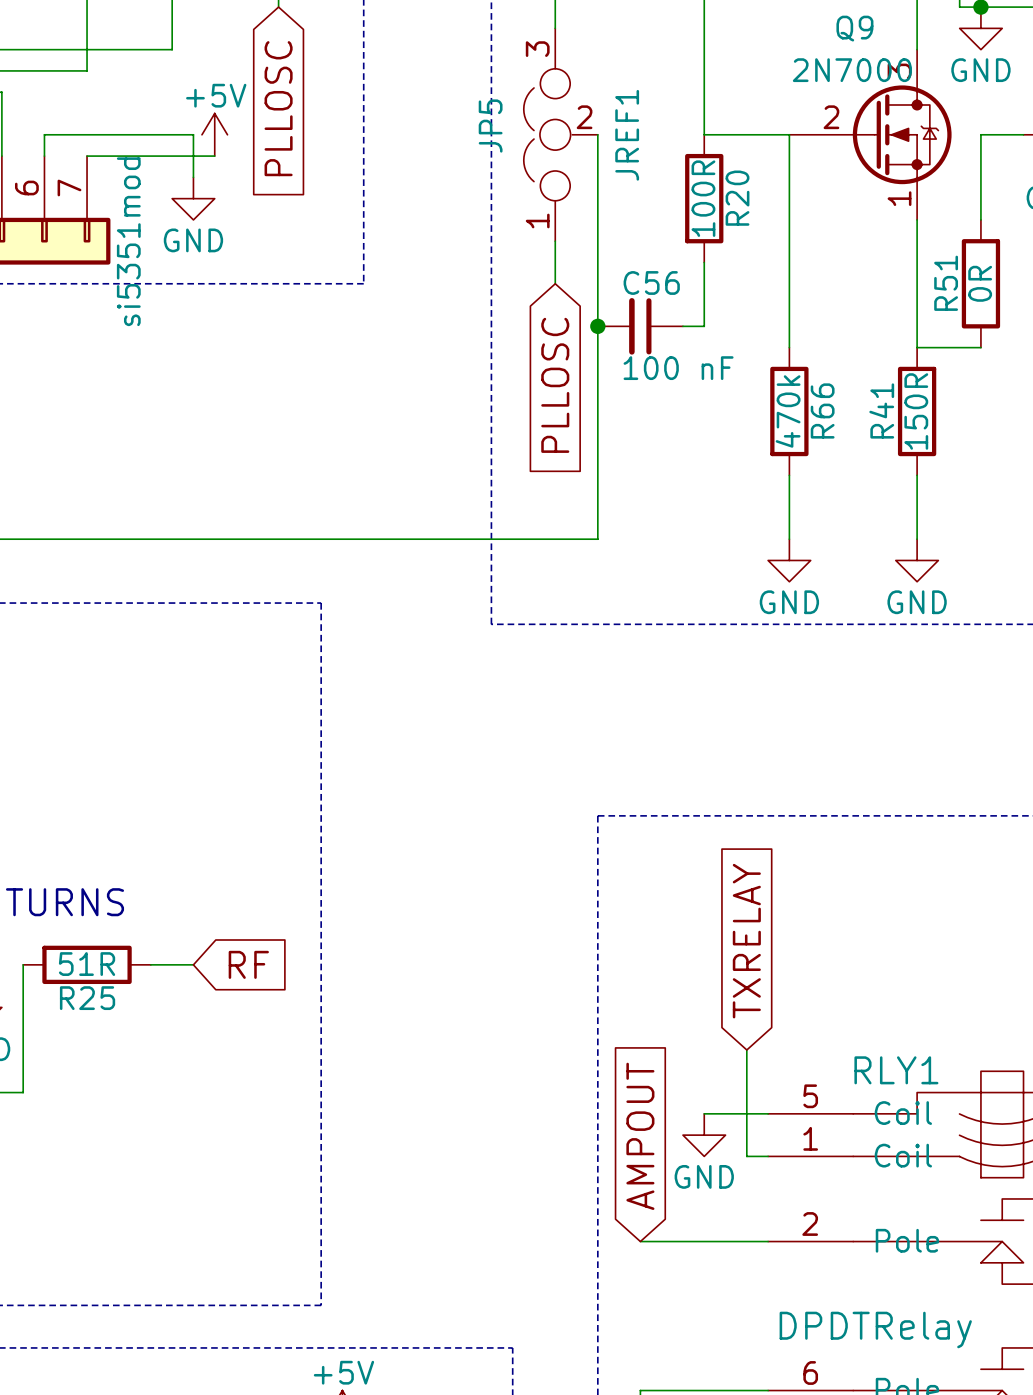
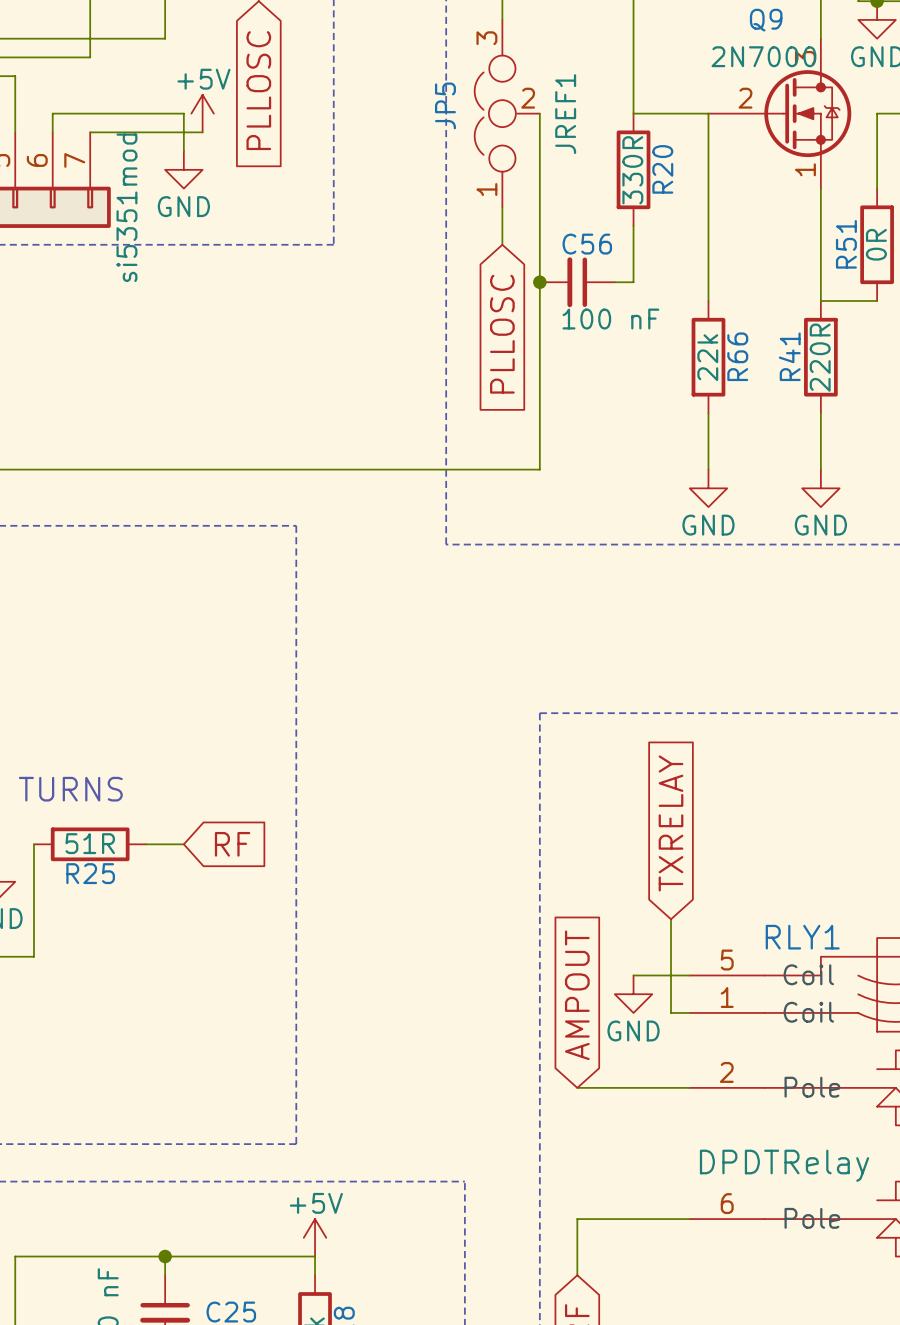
R20 value: 100R (703, 198) -> 330R (632, 170)
R66 value: 470k (788, 411) -> 22k (707, 357)
R41 value: 150R (916, 411) -> 220R (820, 357)

